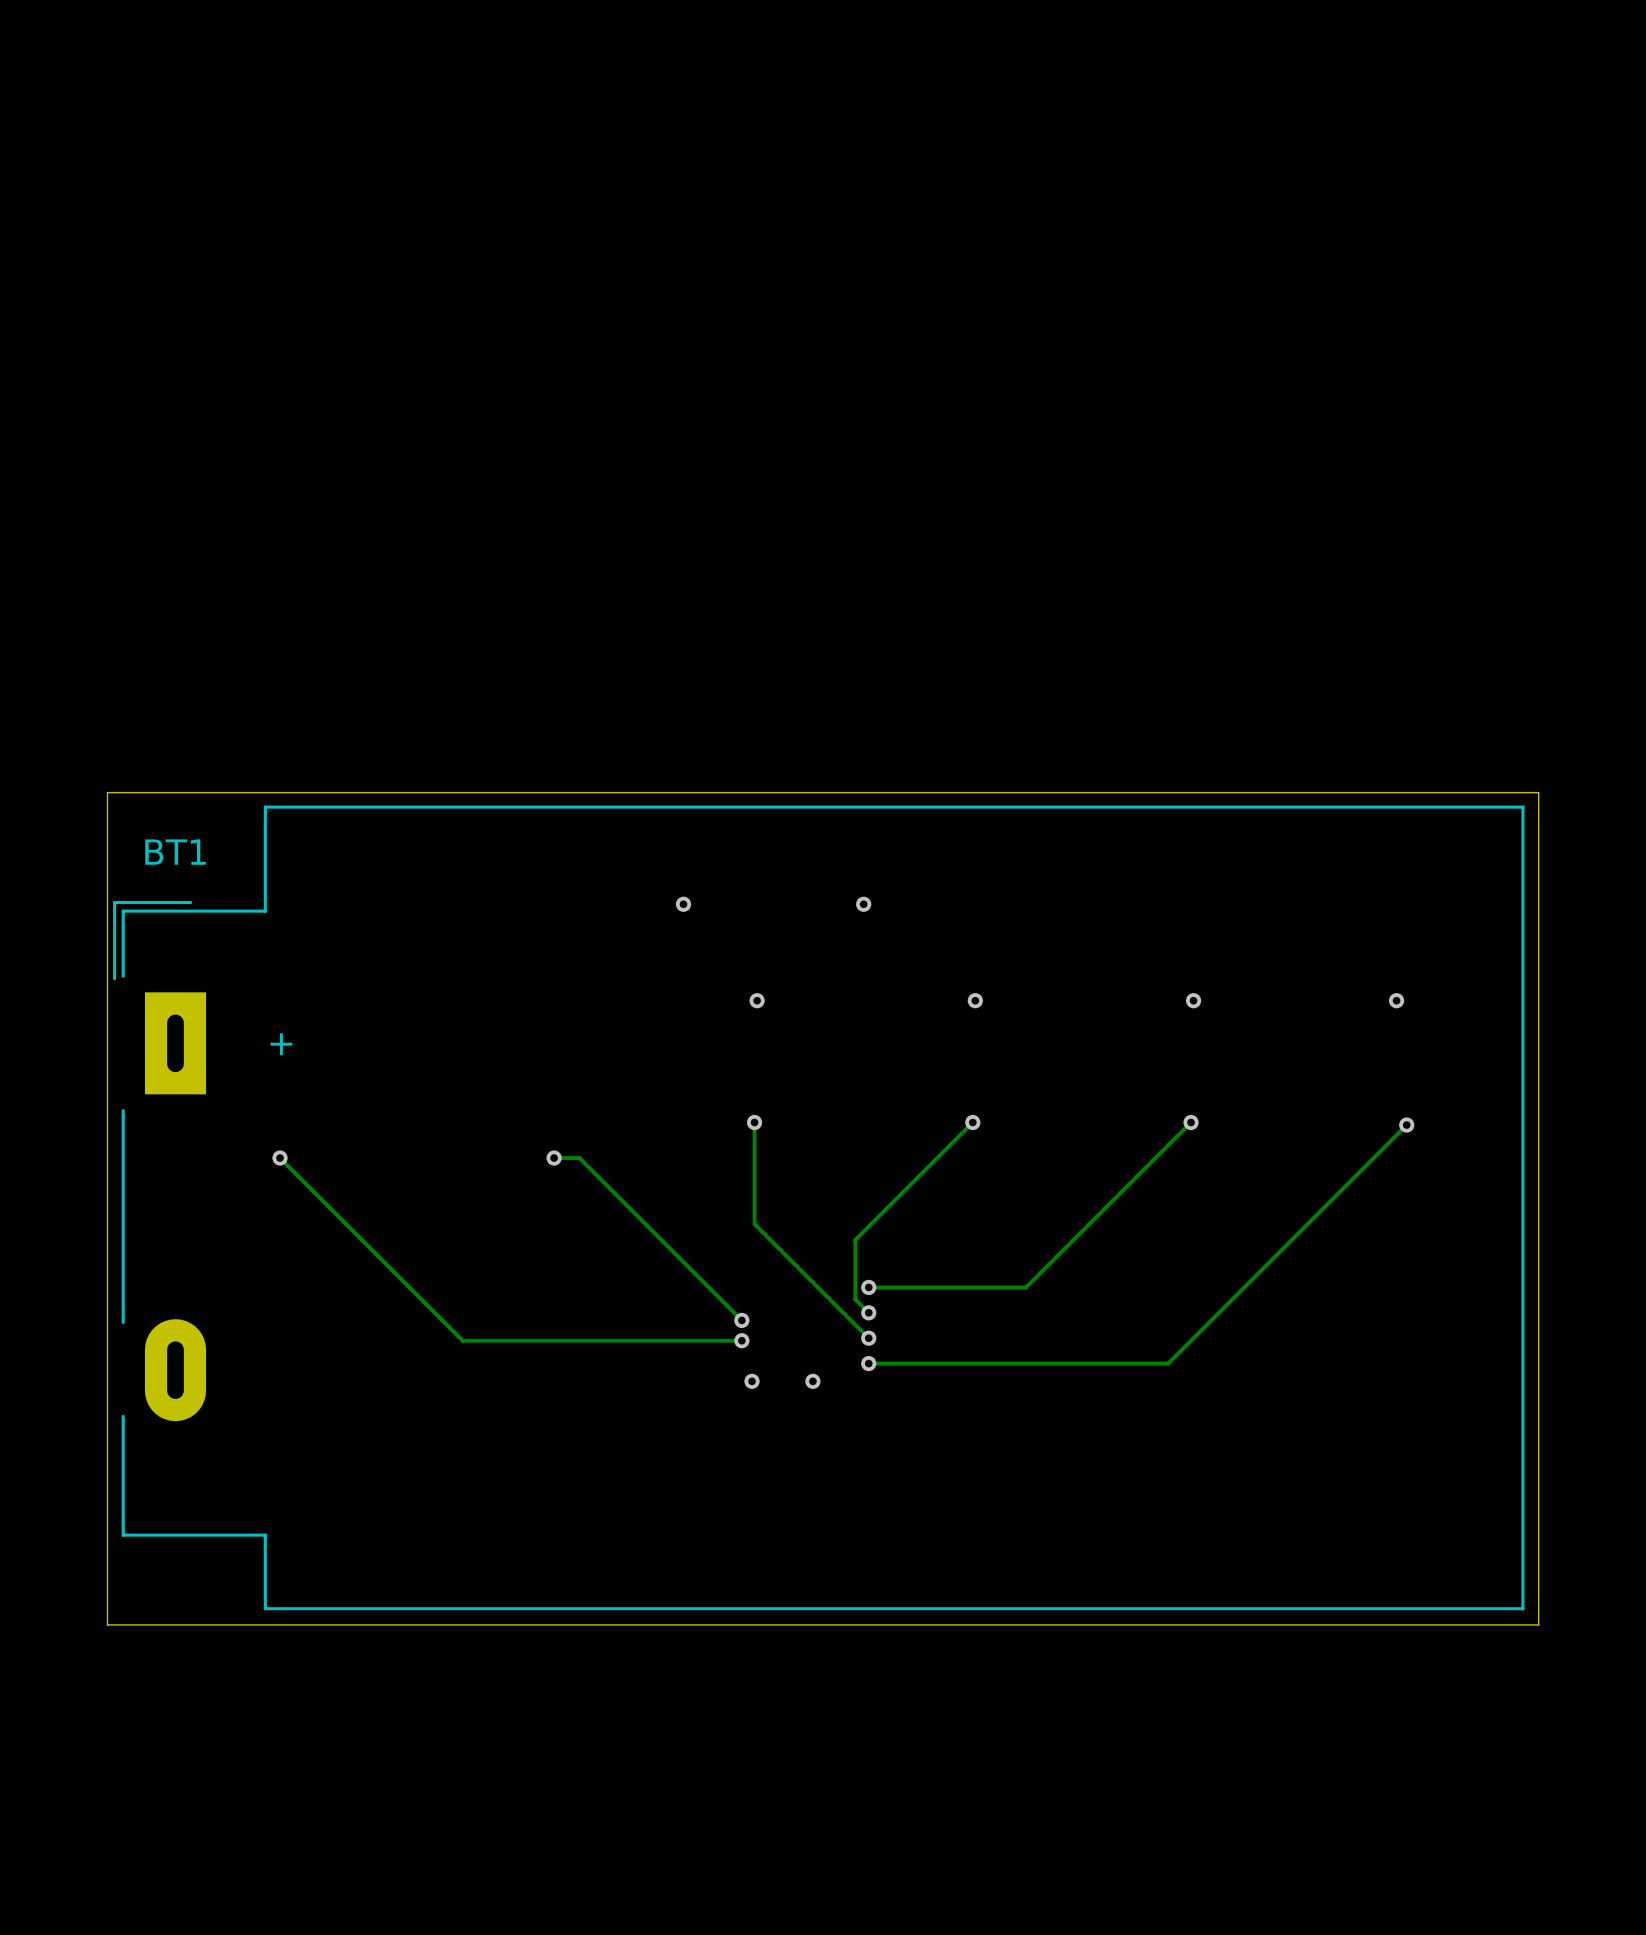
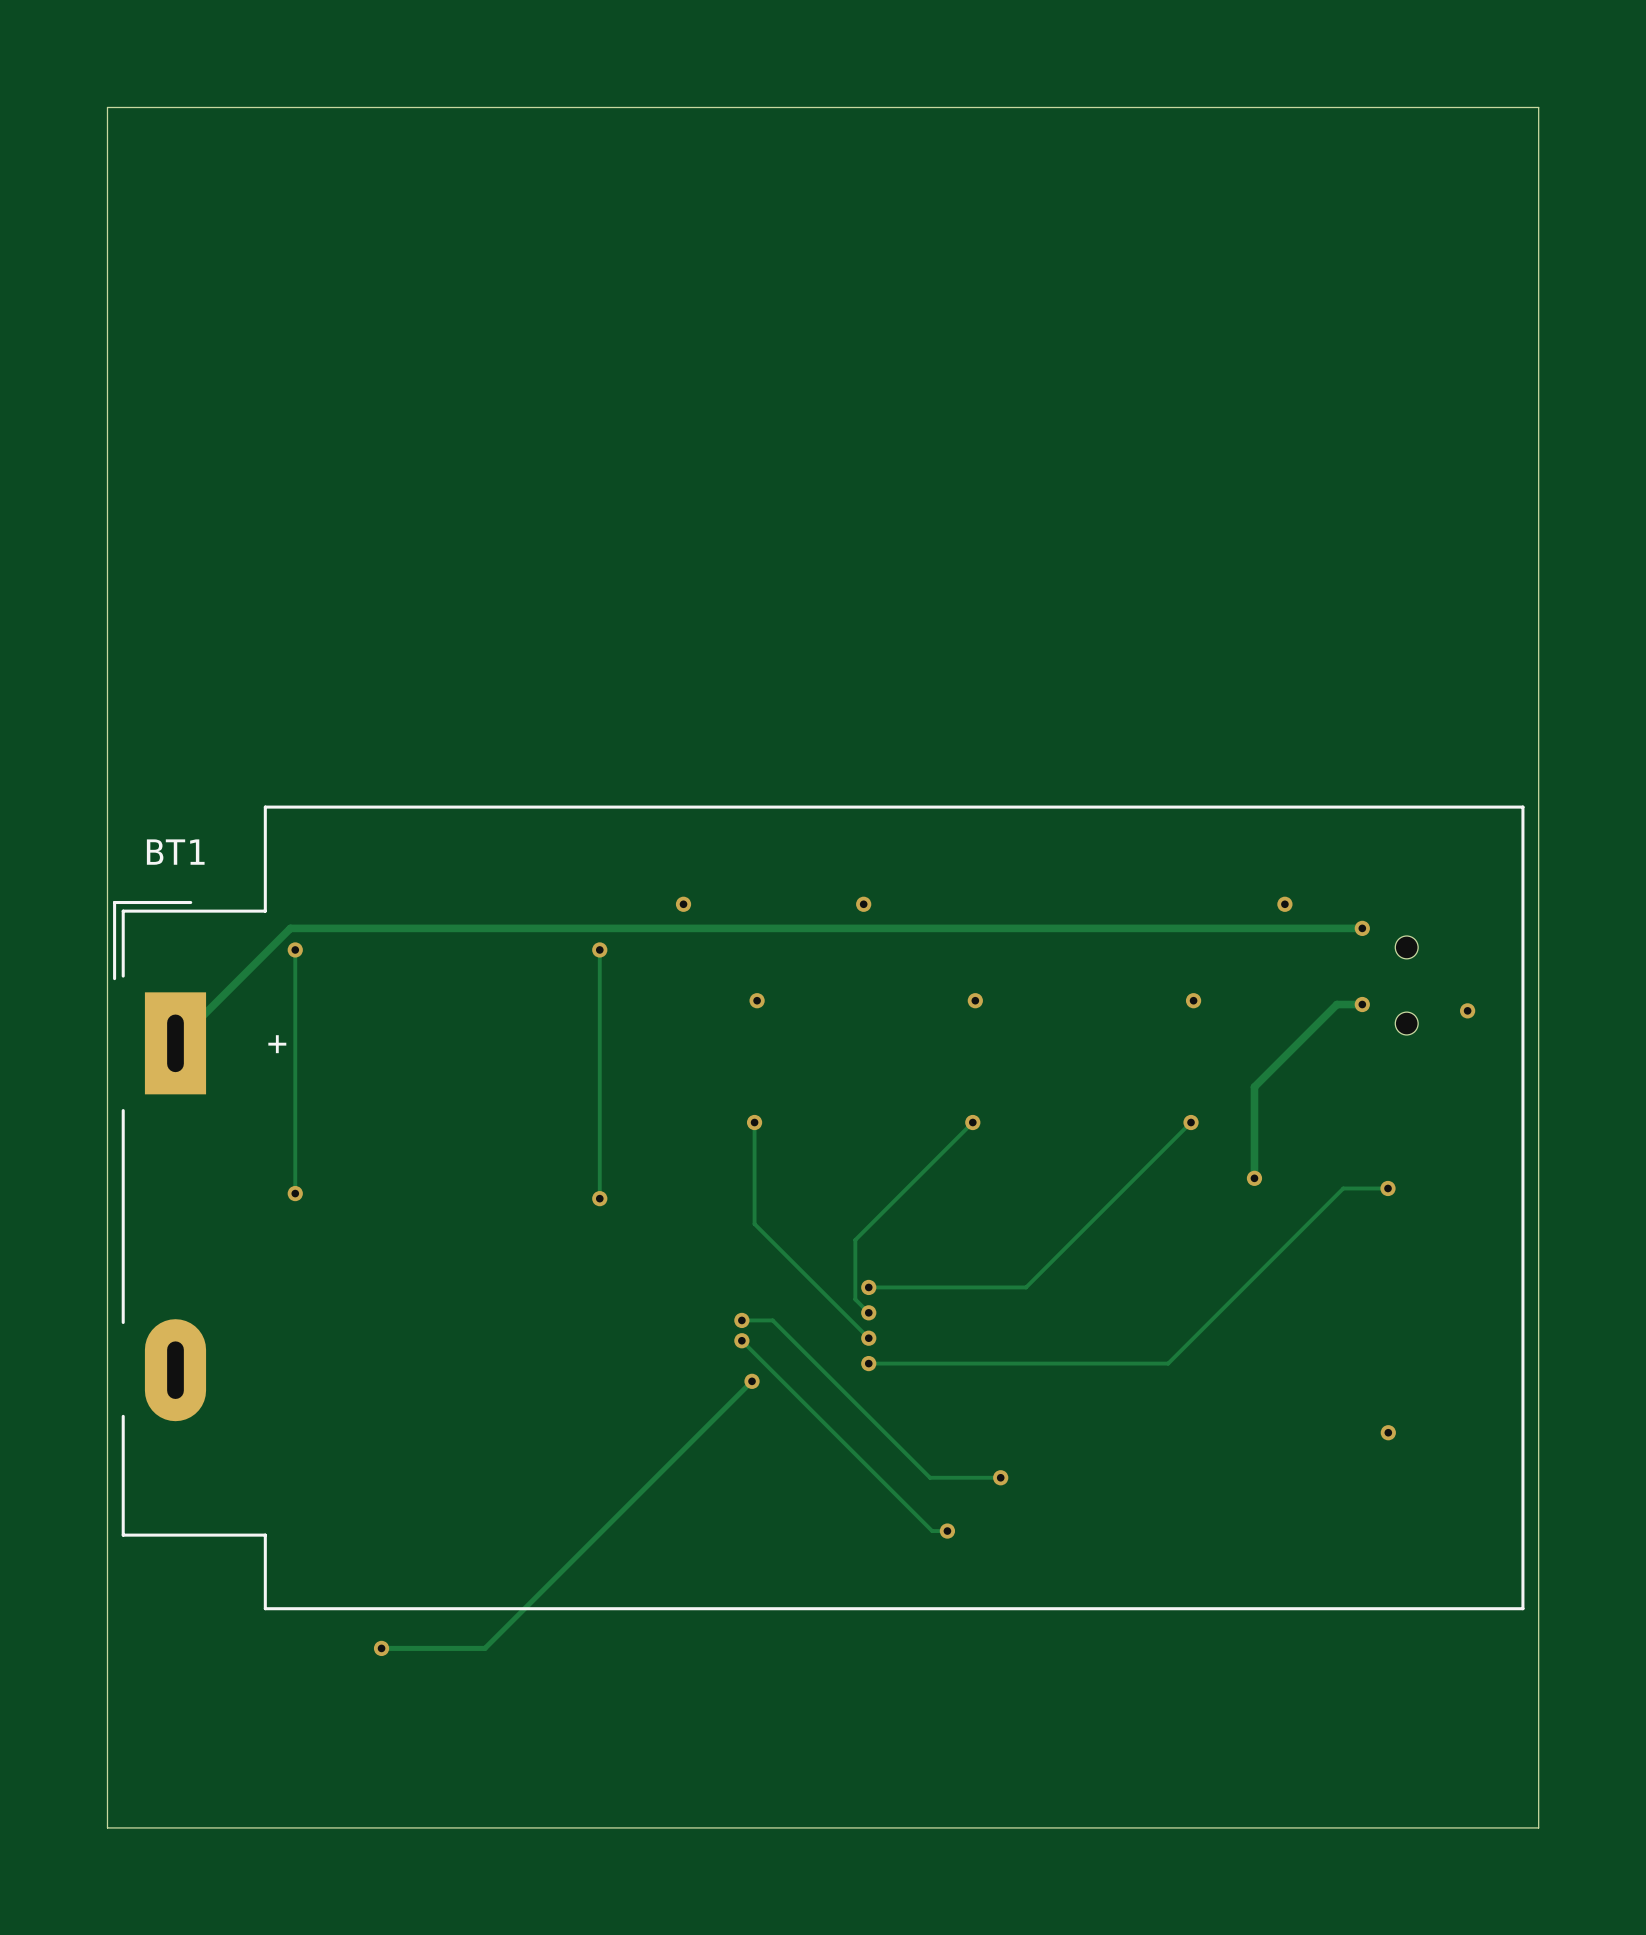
board edge: (1538, 792) (107, 792) -> (1538, 792) (1538, 107) (107, 107) (107, 792)
via: none -> (1284, 904)
track: none -> (1362, 928) (290, 928) (175, 1043)
via: none -> (1362, 928)
track: none -> (295, 949) (295, 1193)
via: none -> (295, 949)
track: none -> (599, 949) (599, 1198)
via: none -> (599, 949)
part: none -> (1406, 985)
via position: (1396, 1000) -> (1362, 1004)
track: none -> (1362, 1004) (1336, 1004) (1254, 1086) (1254, 1178)
via: none -> (1467, 1010)
track: (1406, 1125) (1343, 1188) -> (1388, 1188) (1343, 1188)
via: (1406, 1125) -> none
track: (280, 1158) (462, 1340) (741, 1340) -> (947, 1531) (932, 1531) (741, 1340)
via position: (280, 1158) -> (295, 1193)
track: (554, 1158) (579, 1158) (741, 1320) -> (1000, 1477) (930, 1477) (772, 1320) (741, 1320)
via position: (554, 1158) -> (599, 1198)
via: none -> (1254, 1178)
via: none -> (1388, 1188)
track: none -> (752, 1381) (484, 1648) (381, 1648)
via: (812, 1381) -> none
via: none -> (1388, 1432)
via: none -> (1000, 1477)
via: none -> (947, 1531)
board edge: (1538, 1624) (107, 1624) -> (1538, 1624) (1538, 1827) (107, 1827) (107, 1624)
via: none -> (381, 1648)

